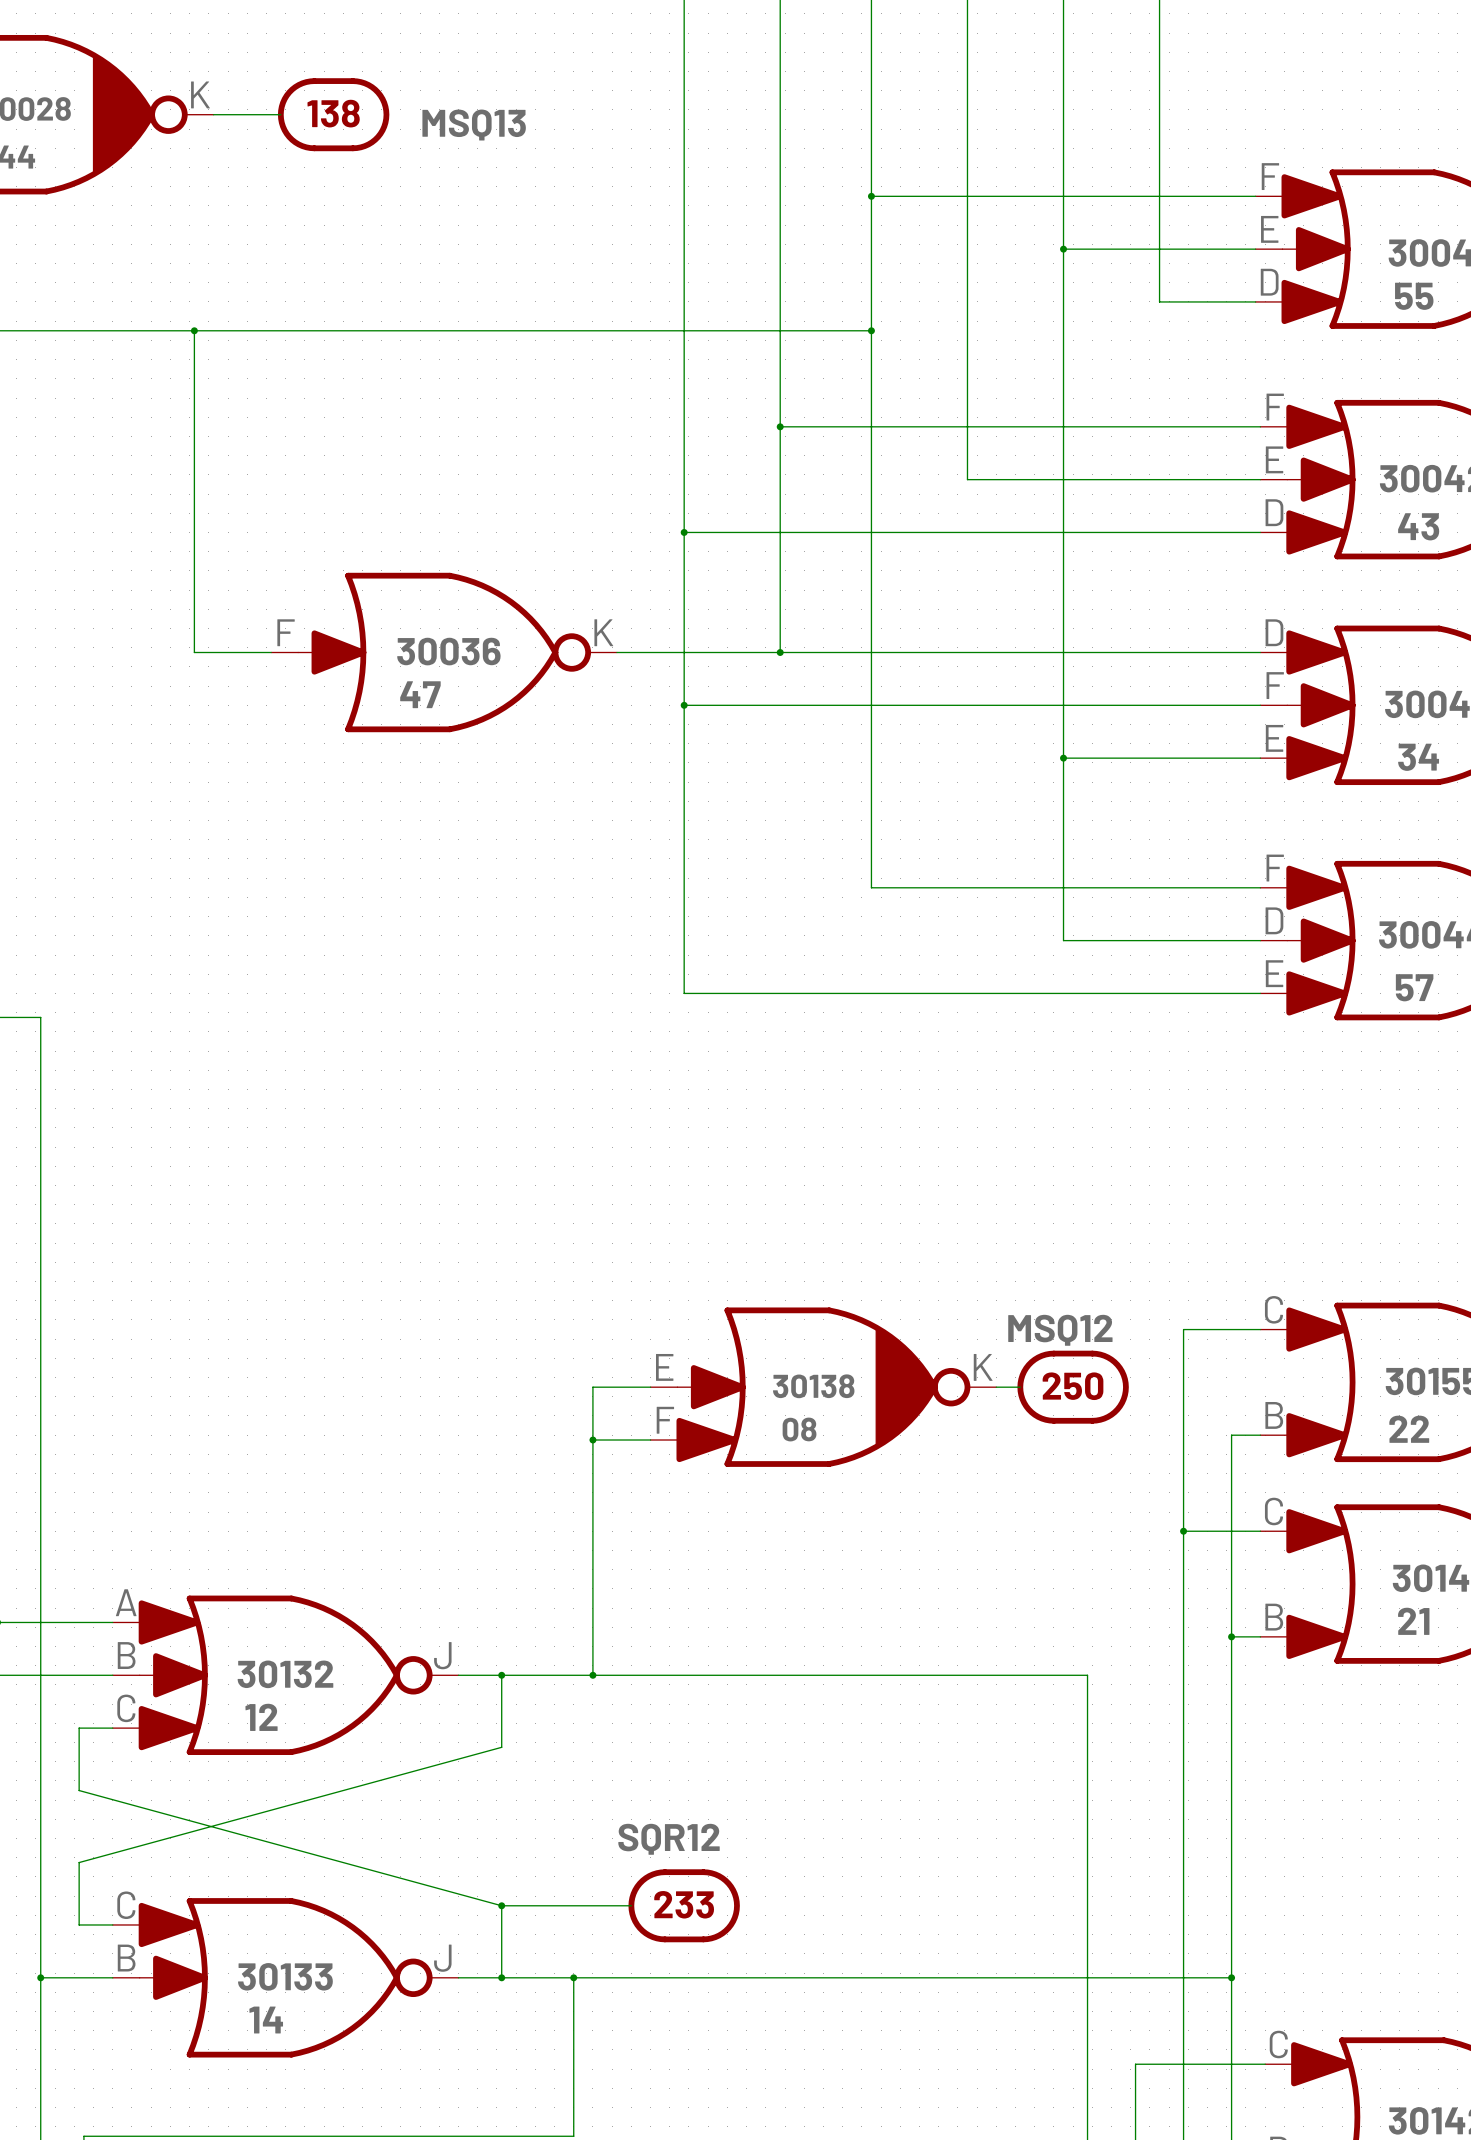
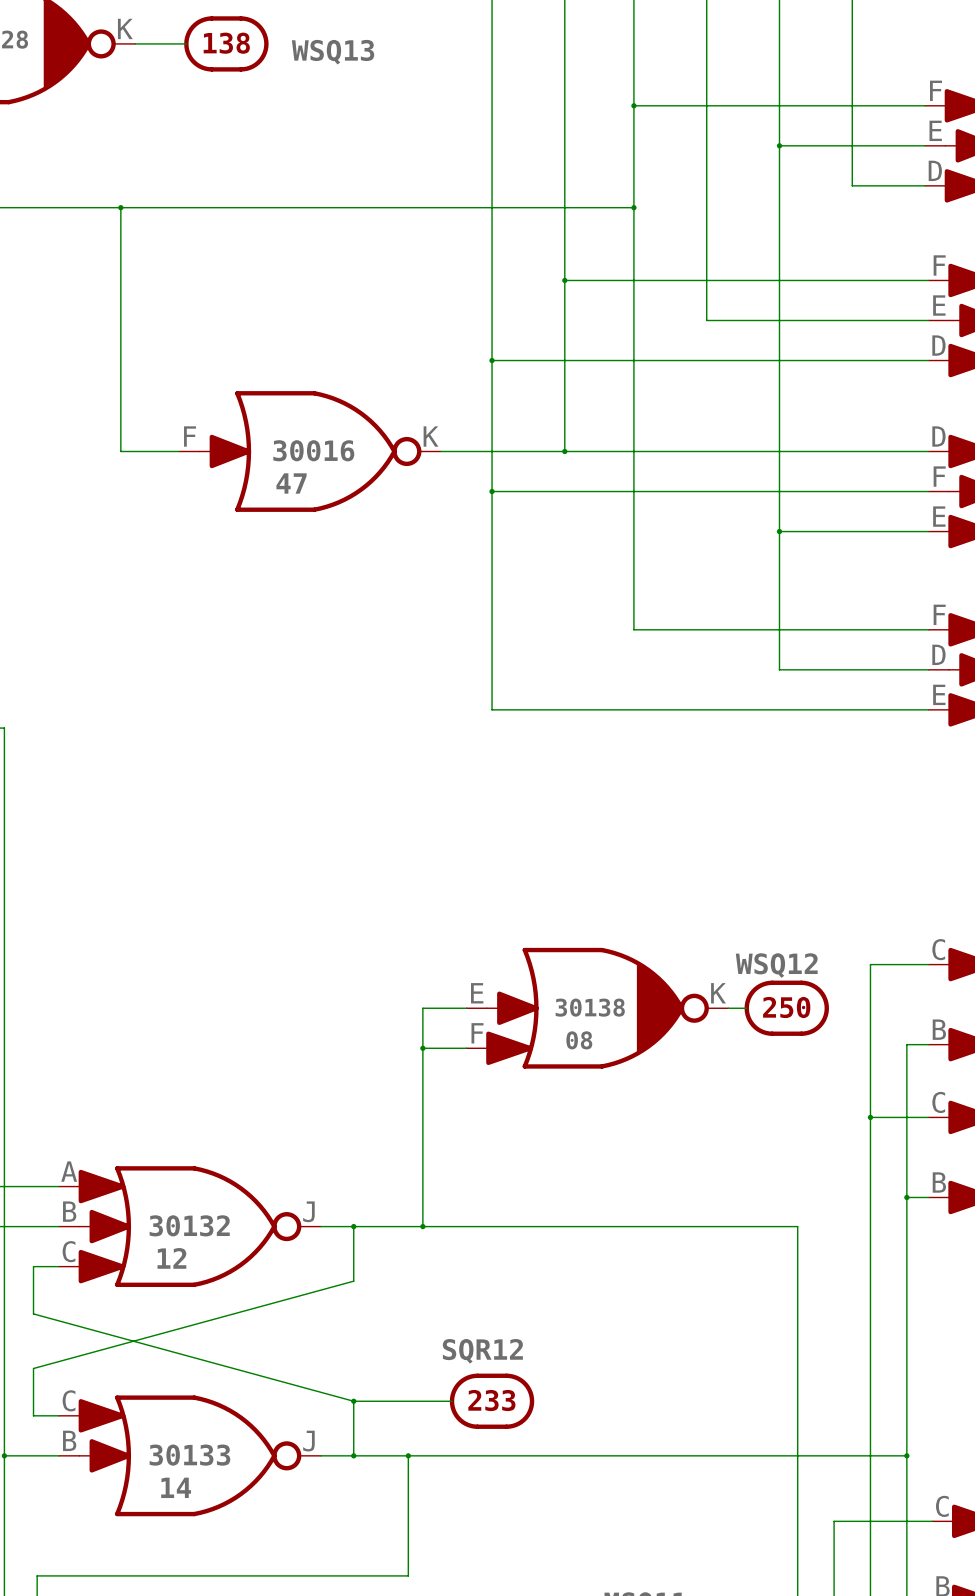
part text: MSQ13 (474, 125) -> WSQ13 (333, 52)
part text: 30036 (448, 651) -> 30016 (313, 450)
part text: MSQ12 (1060, 1330) -> WSQ12 (776, 965)

